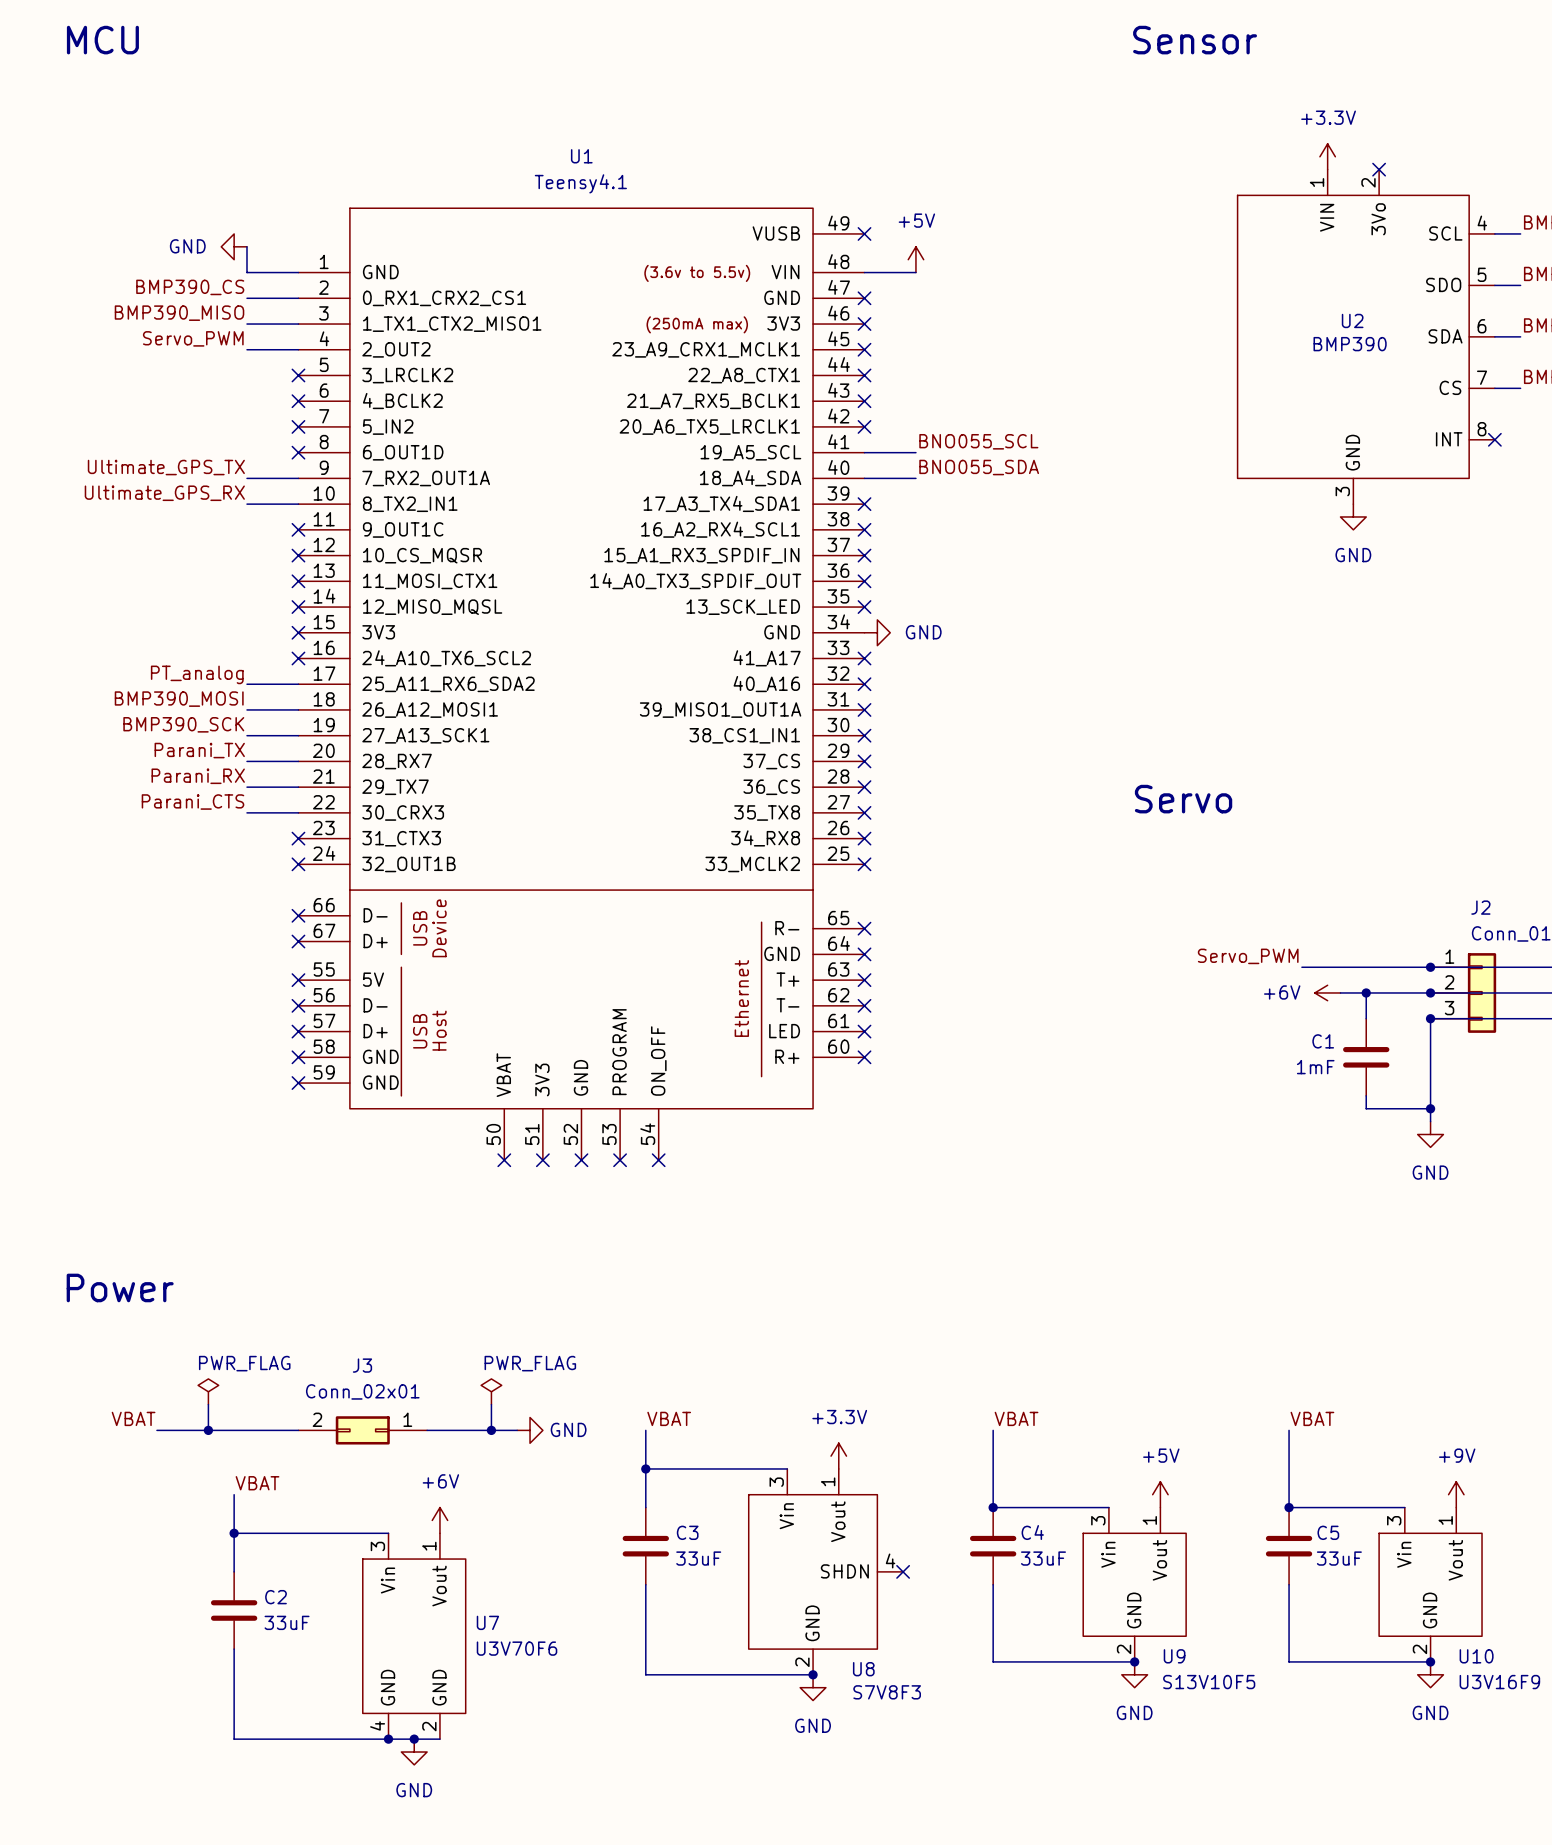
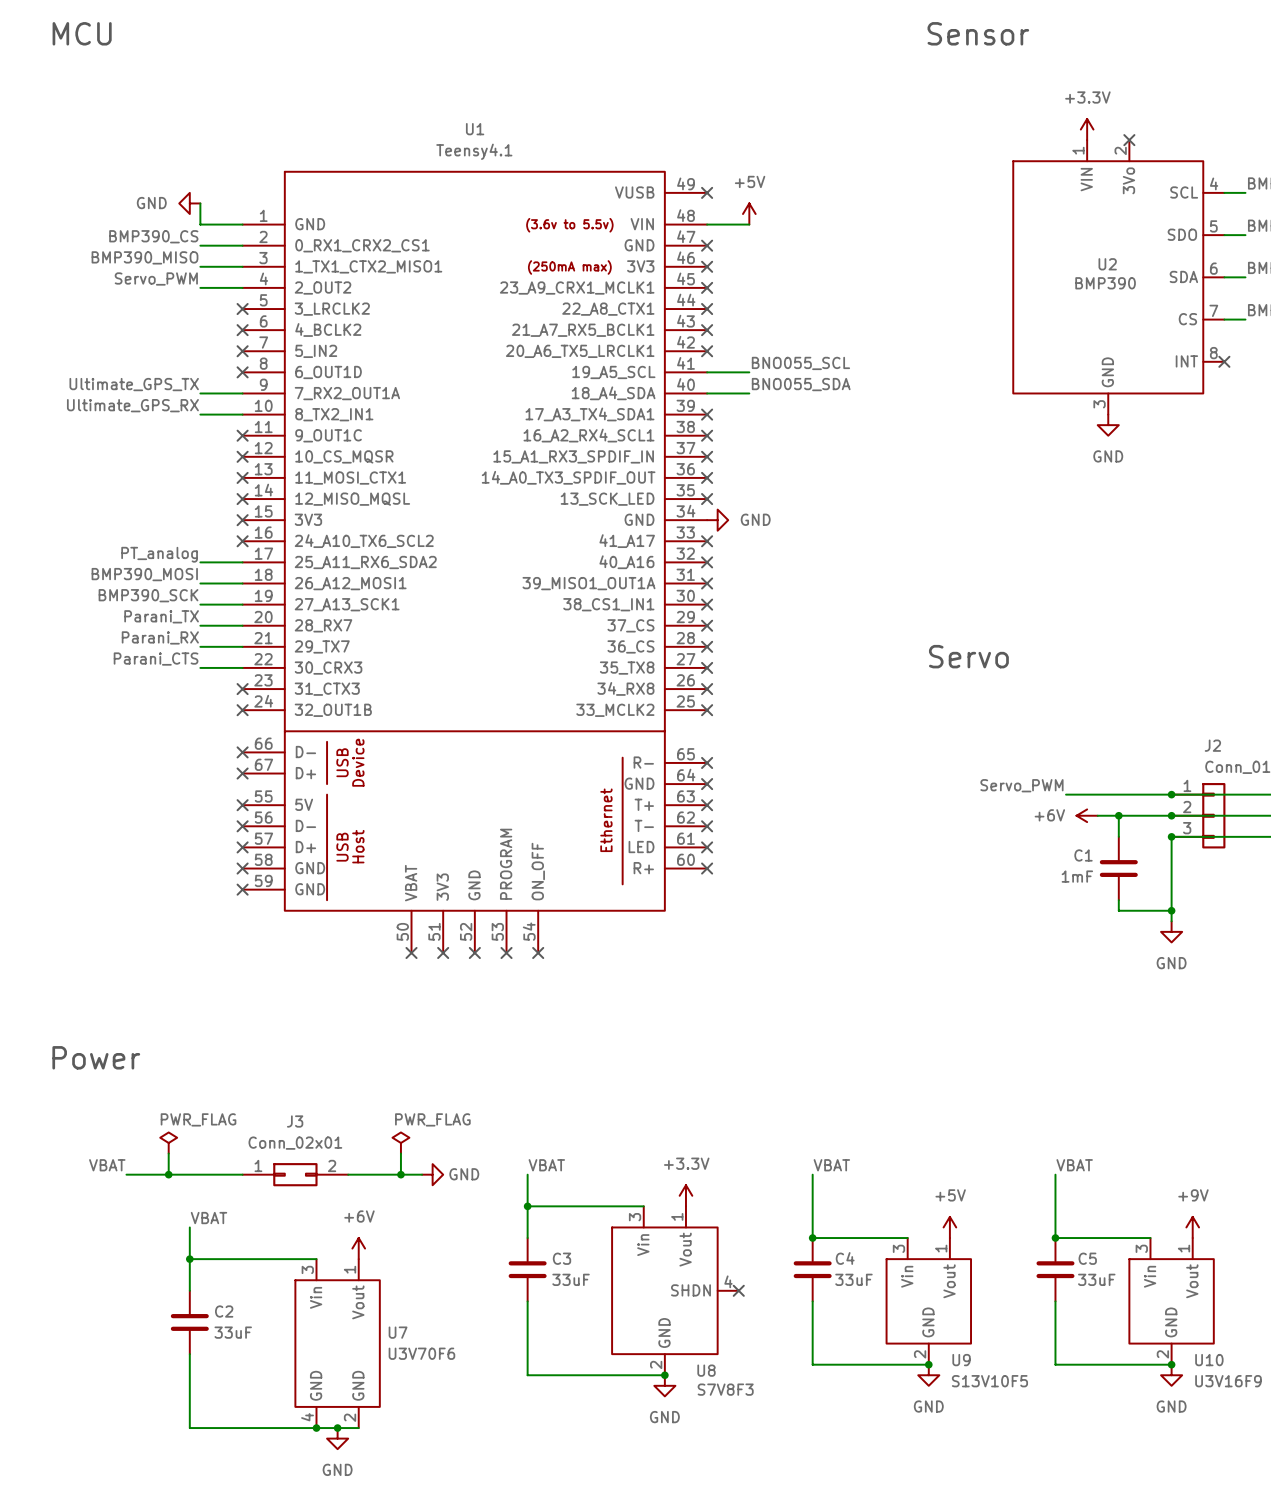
J3 rotation: 0° (362, 1430) -> 180° (295, 1174)

